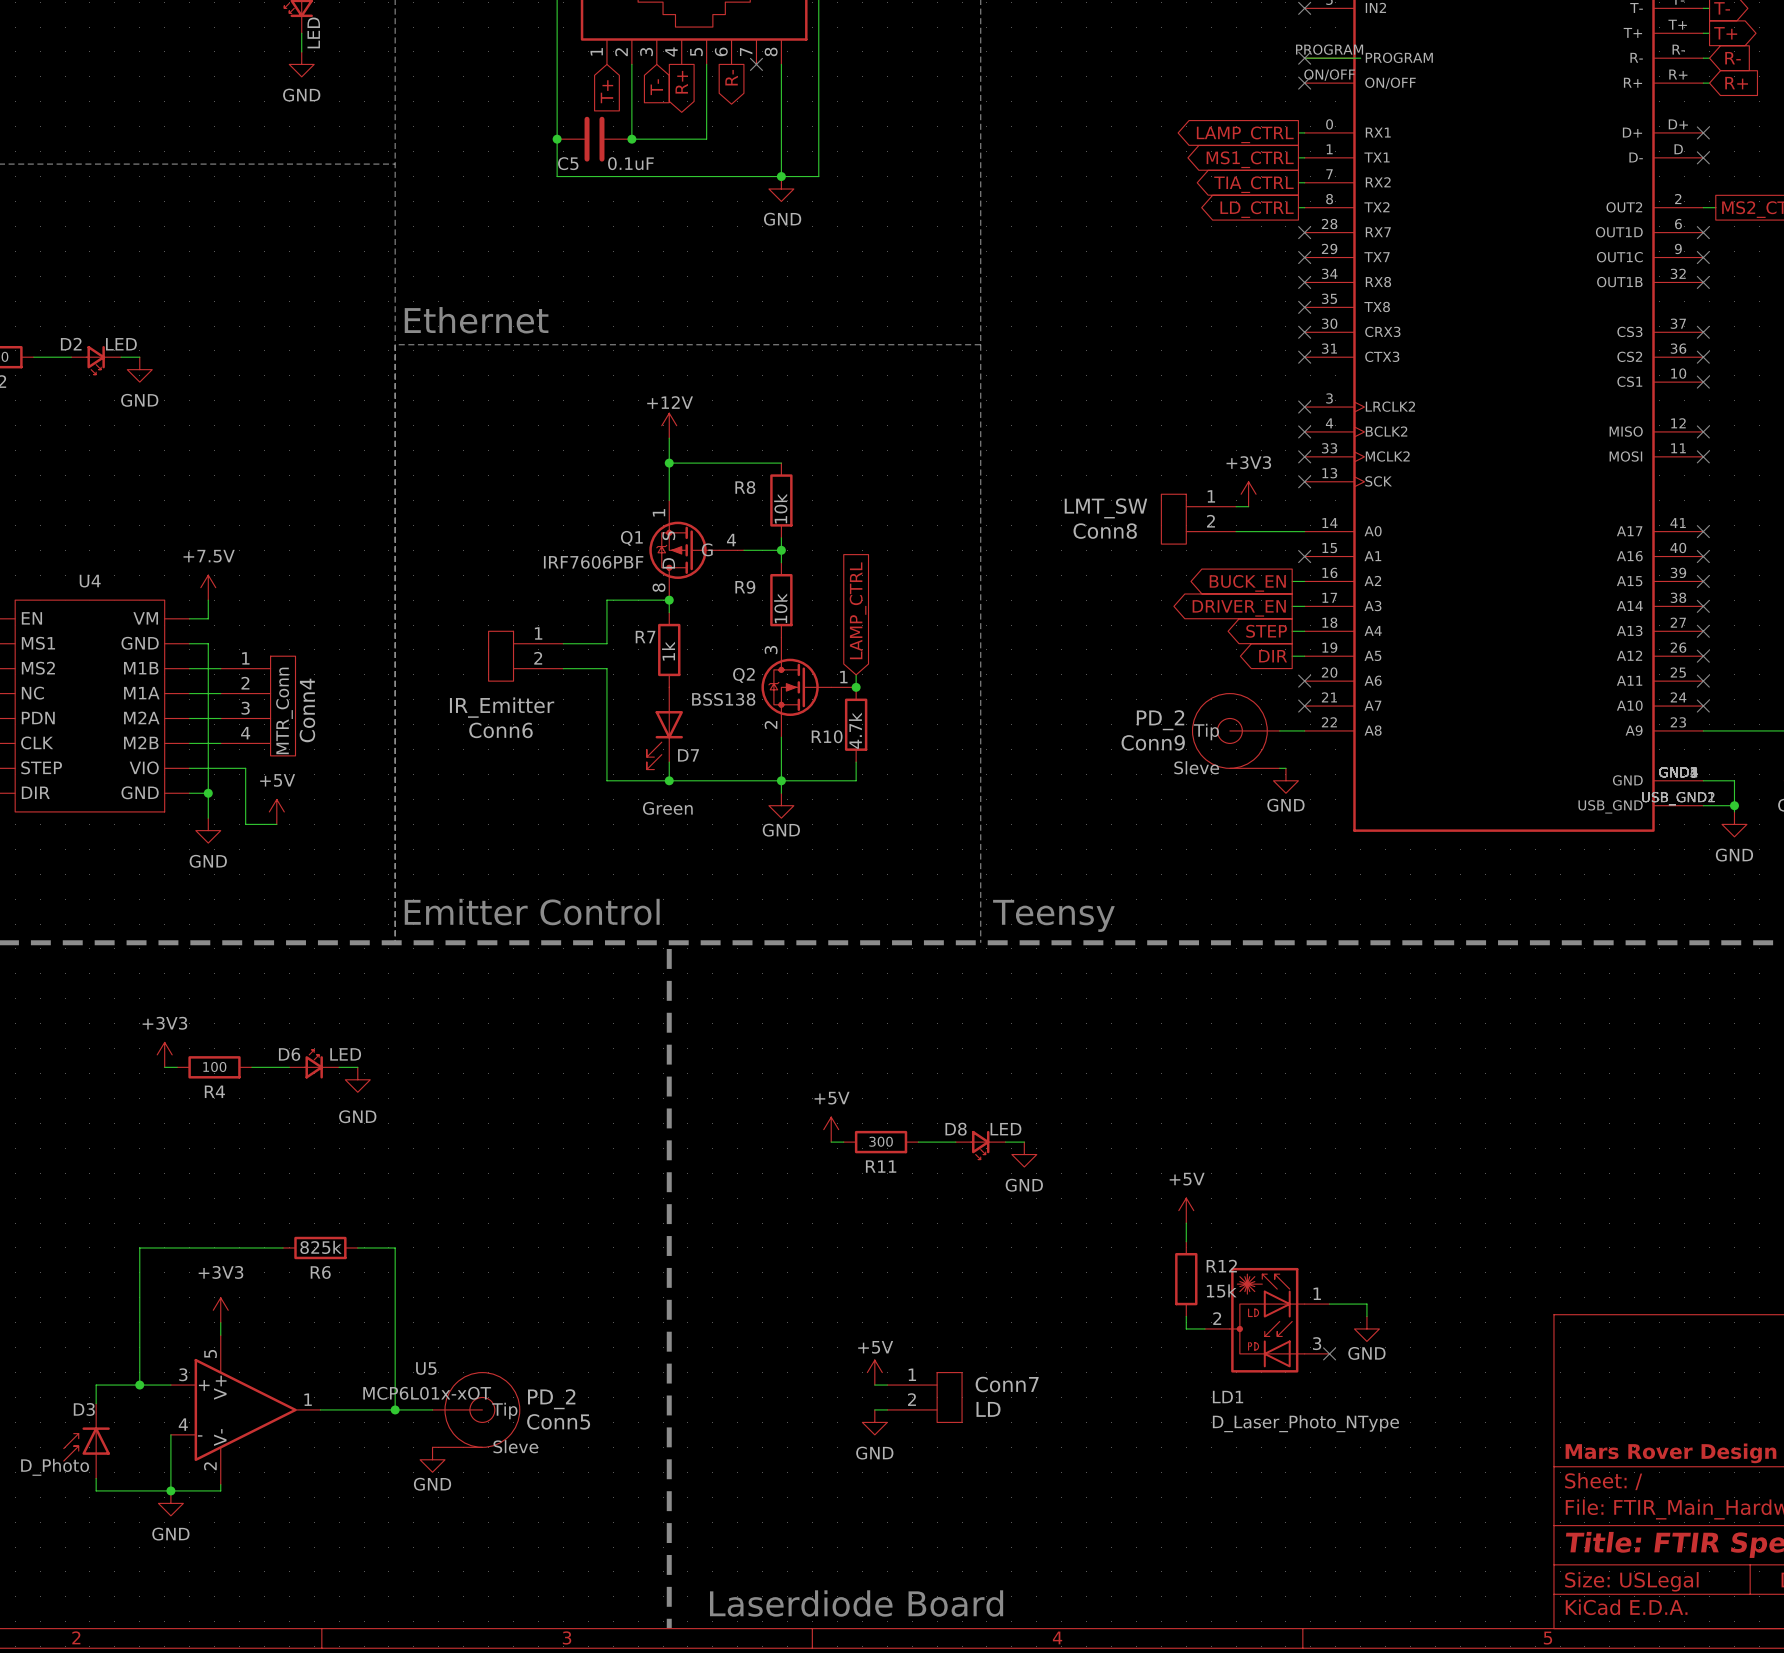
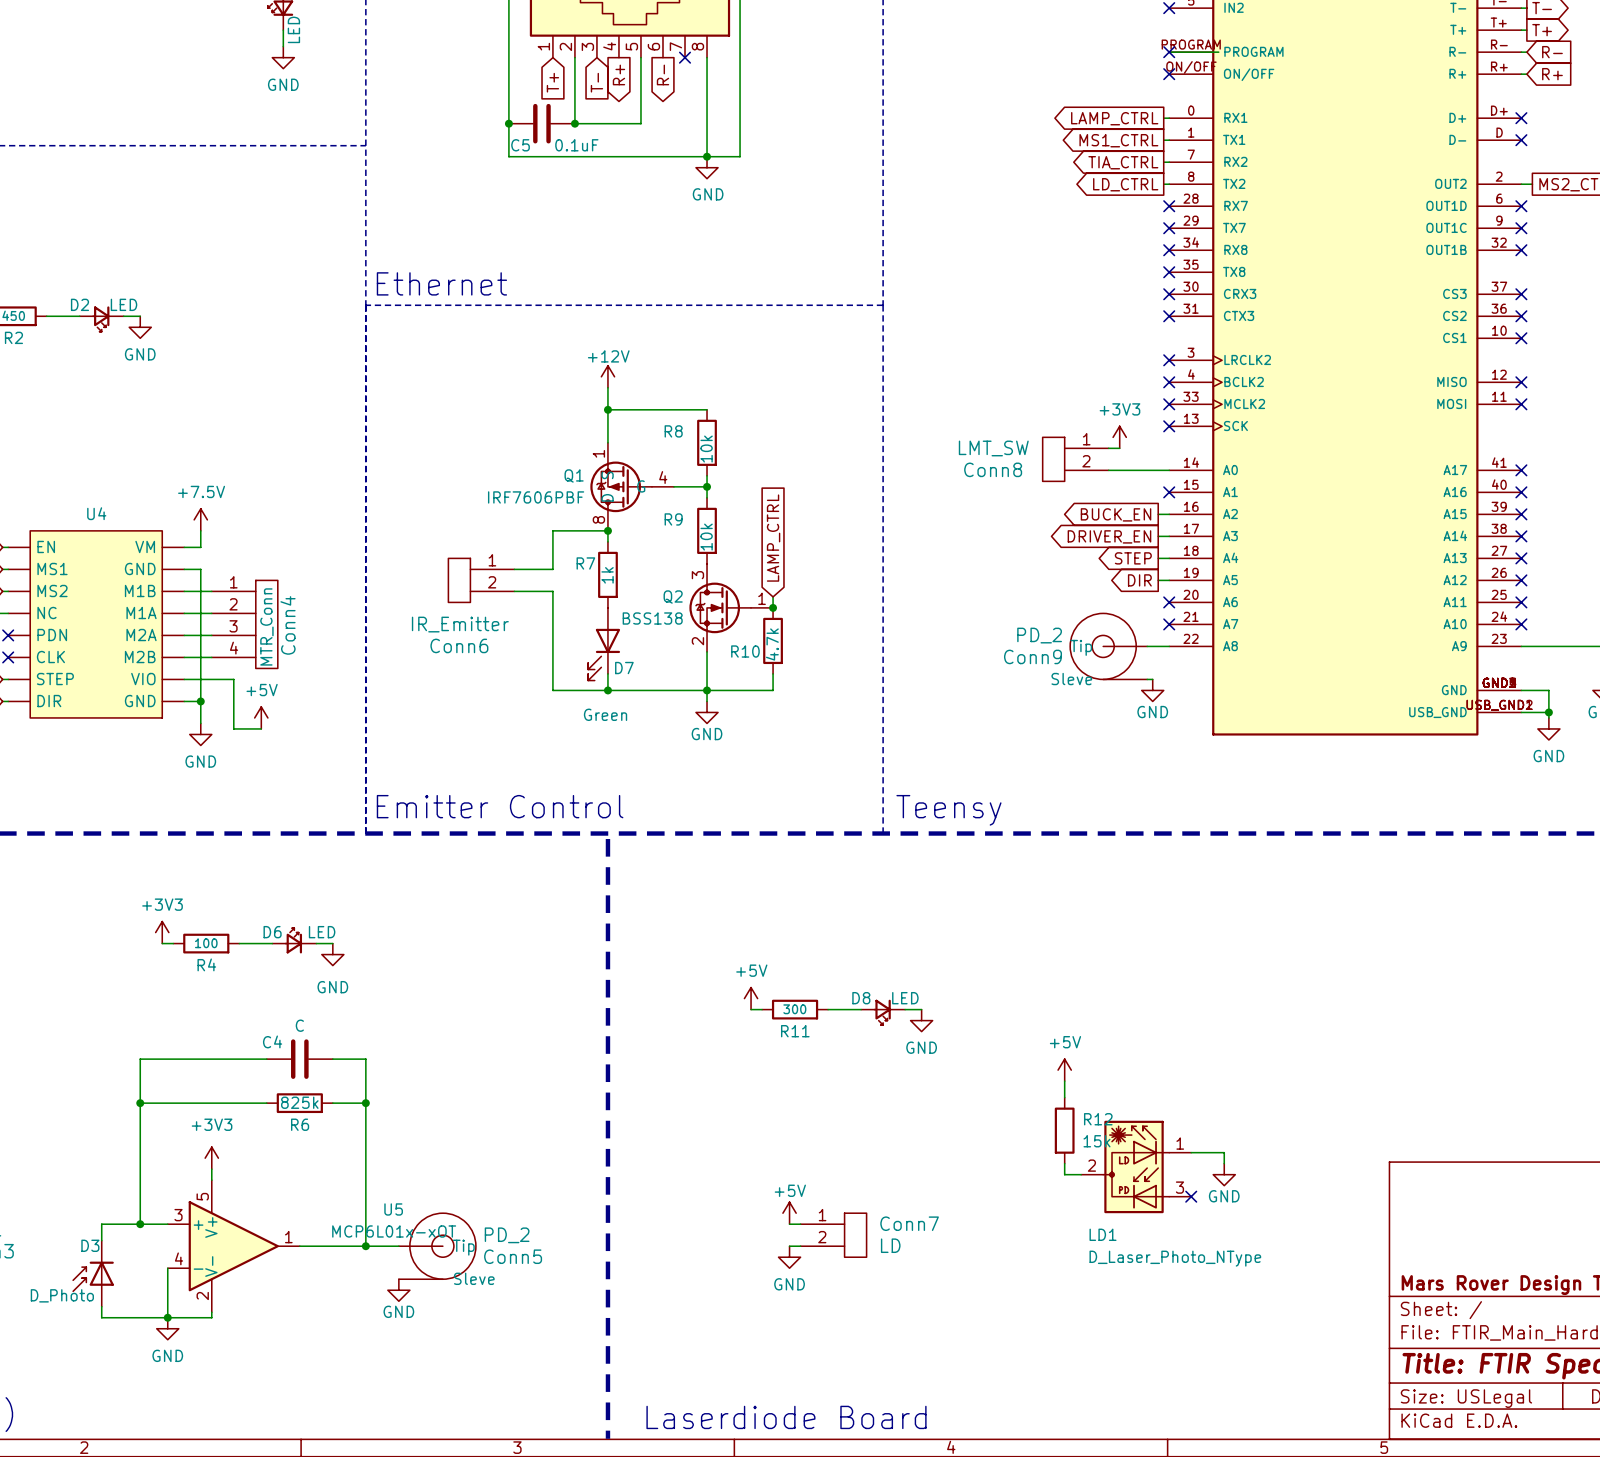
wire: none -> (266, 1059) (140, 1059) (140, 1103)
C4: none -> C (299, 1059)
wire: none -> (332, 1059) (365, 1059) (365, 1103)
junction: none -> (140, 1103)
junction: none -> (365, 1103)

